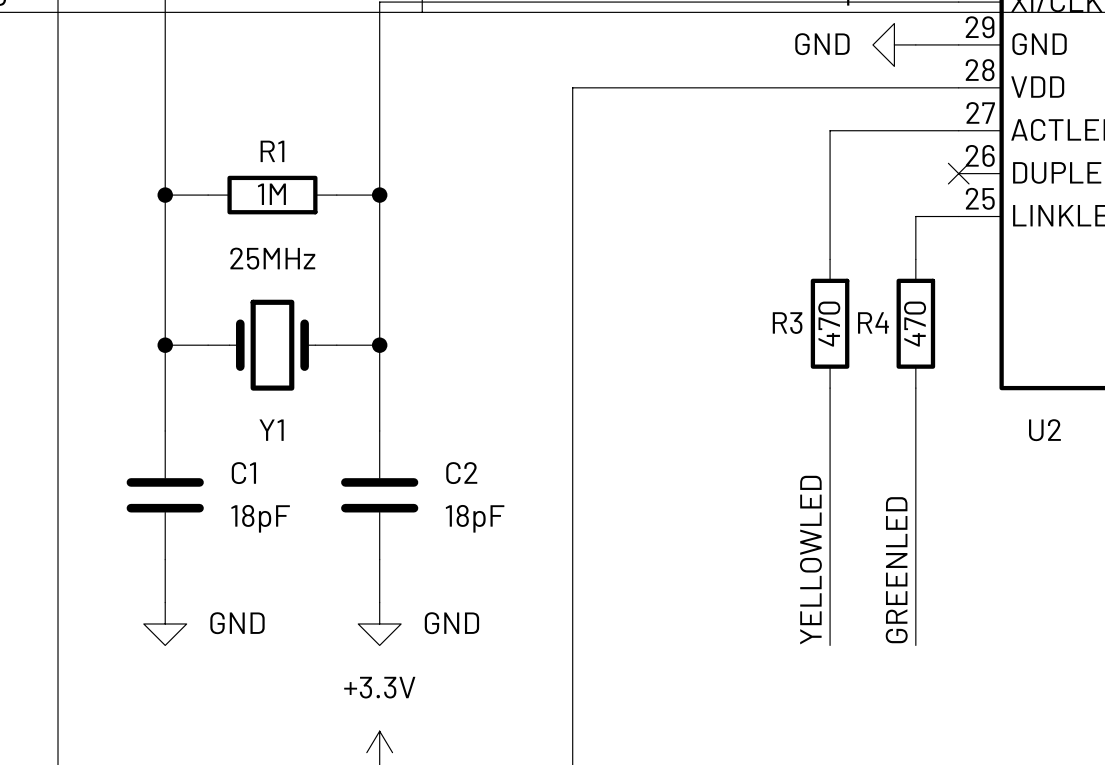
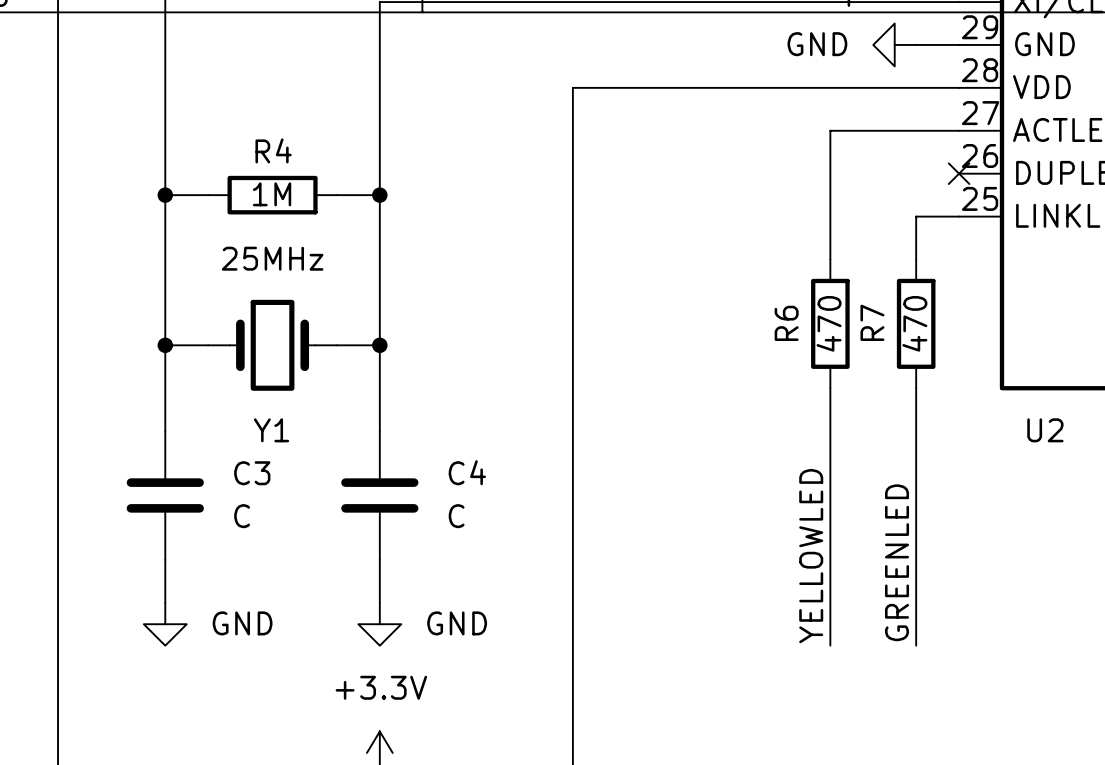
R1 name: R1 (272, 151) -> R4 (273, 150)
R4 name: R4 (873, 322) -> R7 (872, 322)
R3 name: R3 (787, 323) -> R6 (786, 323)
C1 name: C1 (243, 473) -> C3 (252, 473)
C2 name: C2 (461, 473) -> C4 (467, 472)
C1 value: 18pF (260, 518) -> C (242, 516)
C2 value: 18pF (475, 518) -> C (456, 516)

